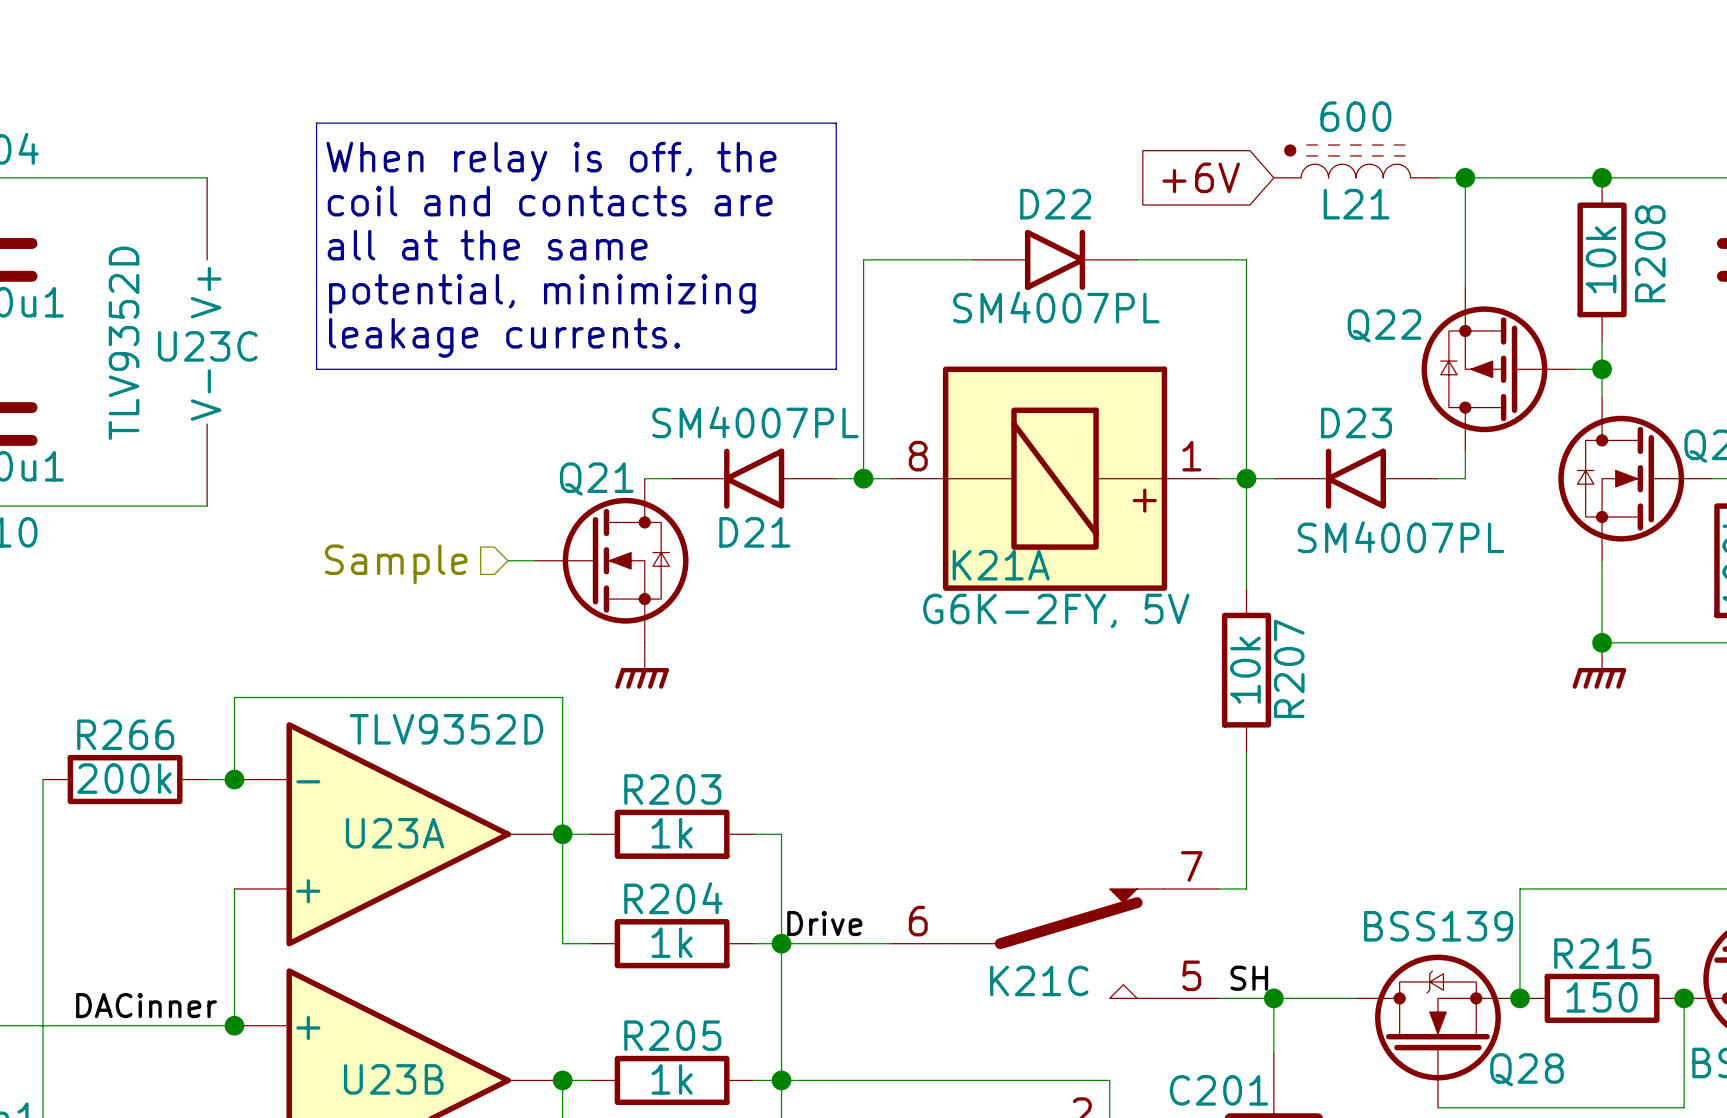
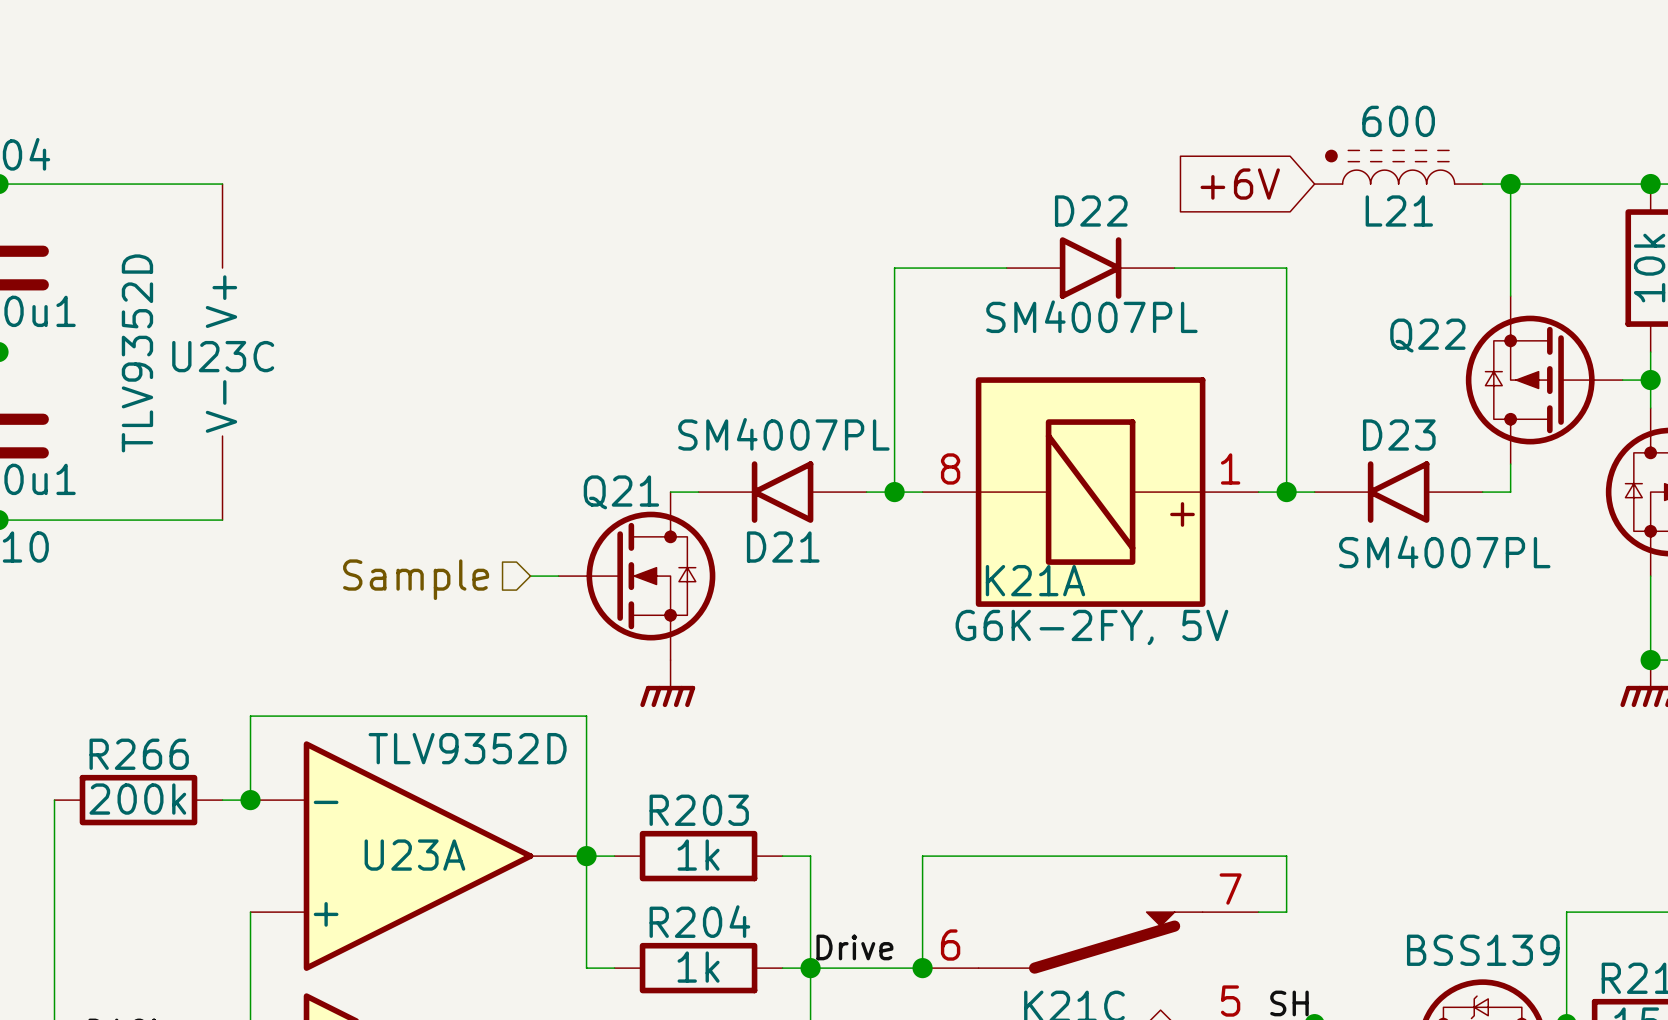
line: (316, 123) (836, 123) (836, 369) (316, 369) (316, 123) -> none
text: When relay is off, the (551, 161) -> none
text: coil and contacts are (550, 201) -> none
text: all at the same (487, 245) -> none
text: potential, minimizing (542, 293) -> none
text: leakage currents. (504, 337) -> none
wire: (1246, 478) (1246, 588) -> none
R207: 10k (1246, 670) -> none
wire: (1246, 752) (1246, 834) -> (922, 968) (922, 856) (1286, 856)
junction: none -> (922, 968)

